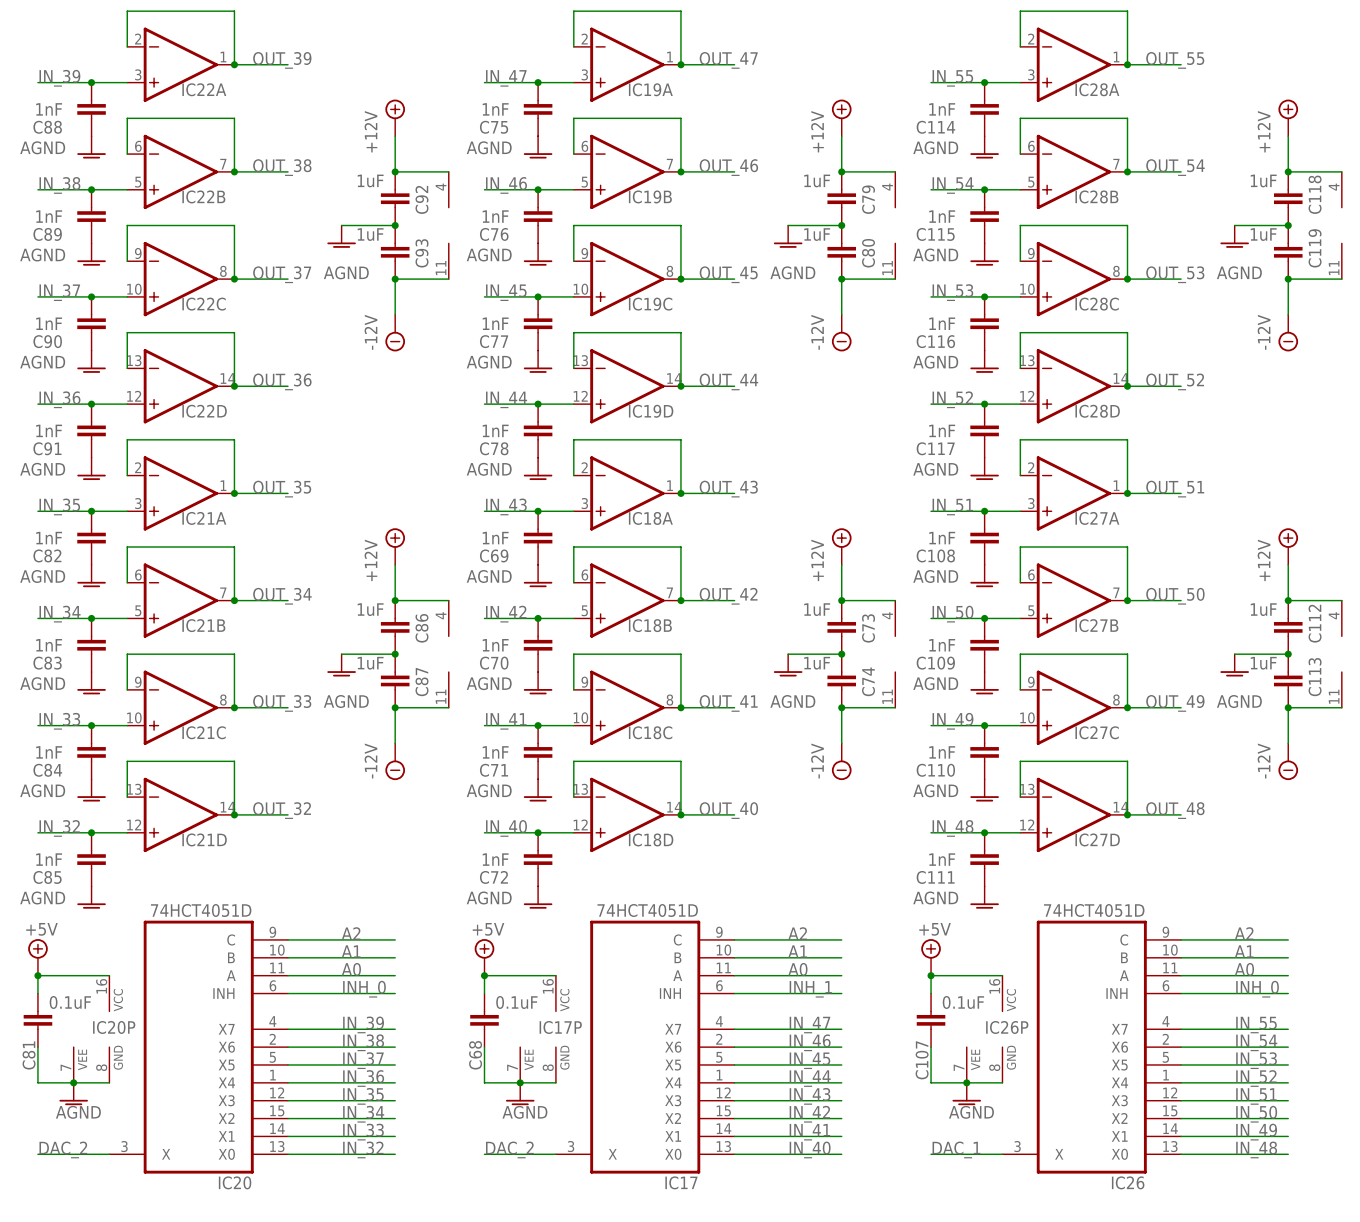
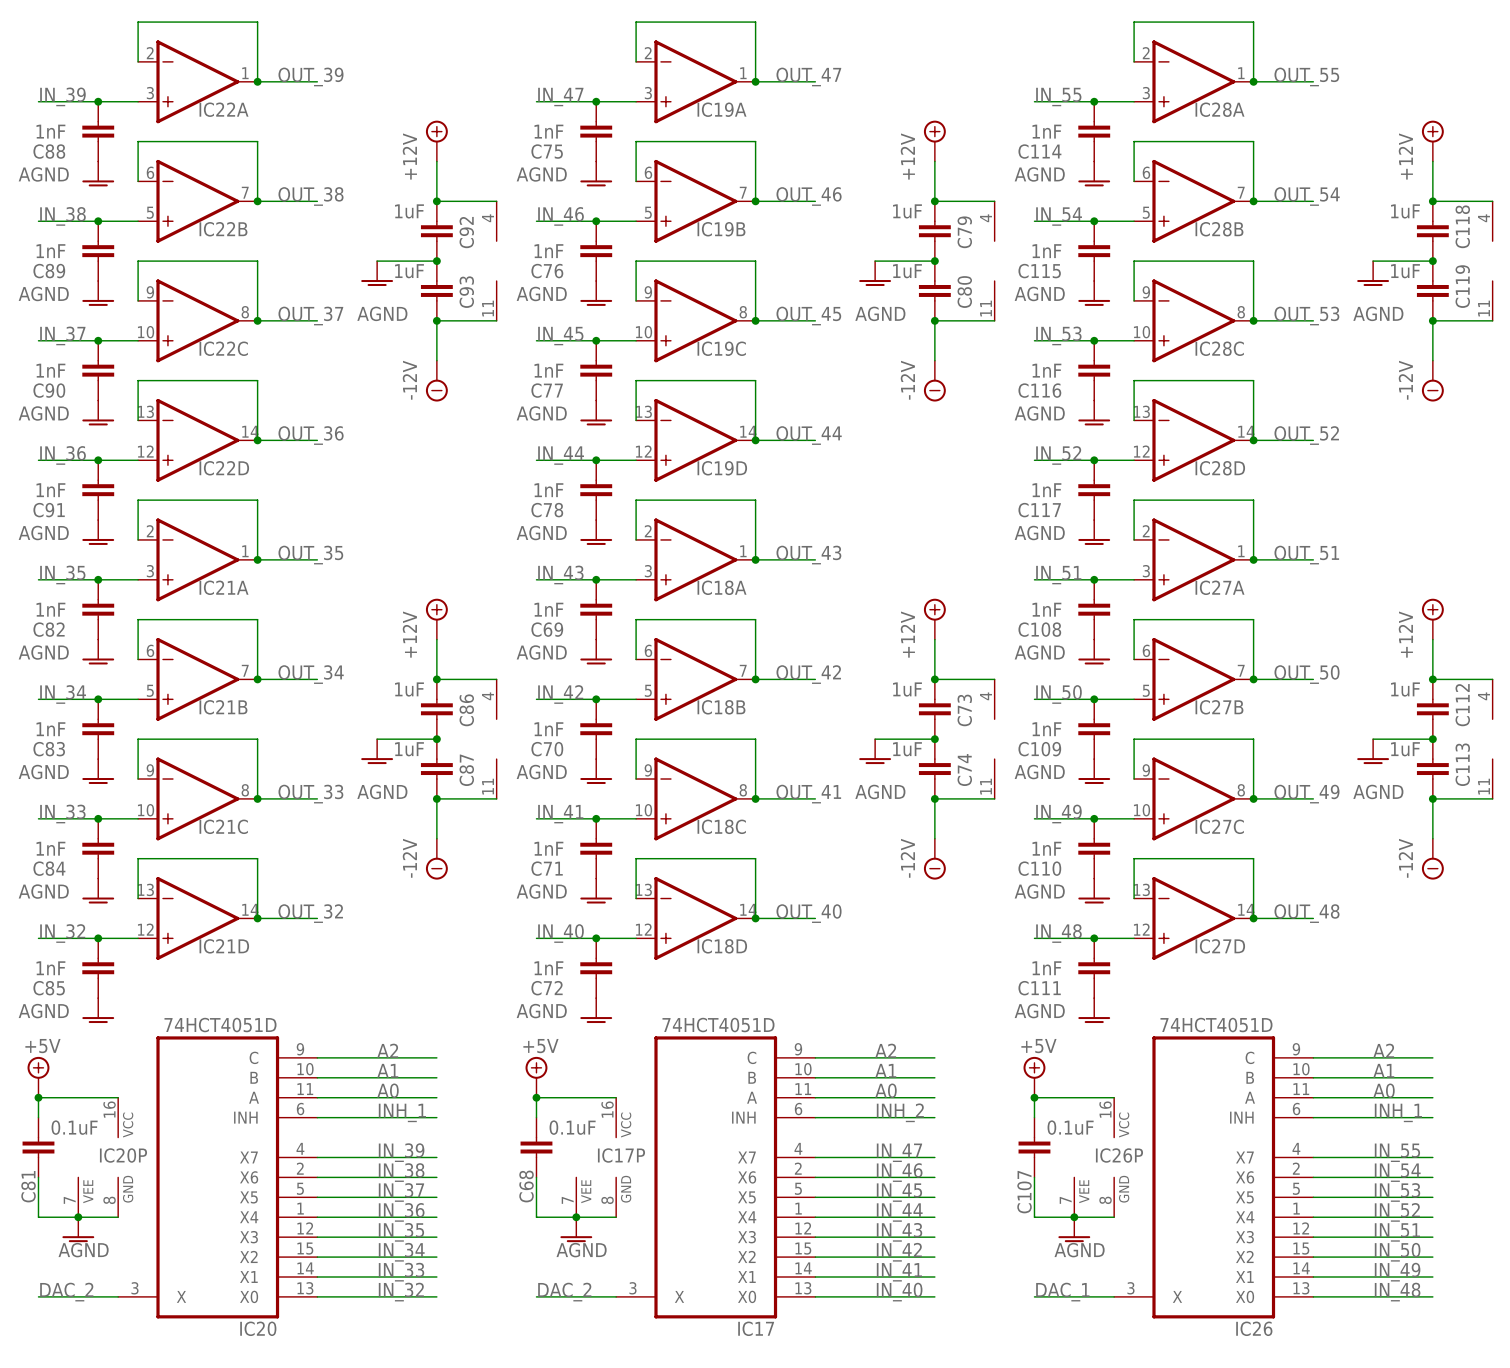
label: INH_0 (364, 989) -> INH_1 (402, 1112)
label: INH_1 (810, 989) -> INH_2 (900, 1112)
label: INH_0 (1257, 989) -> INH_1 (1398, 1112)

